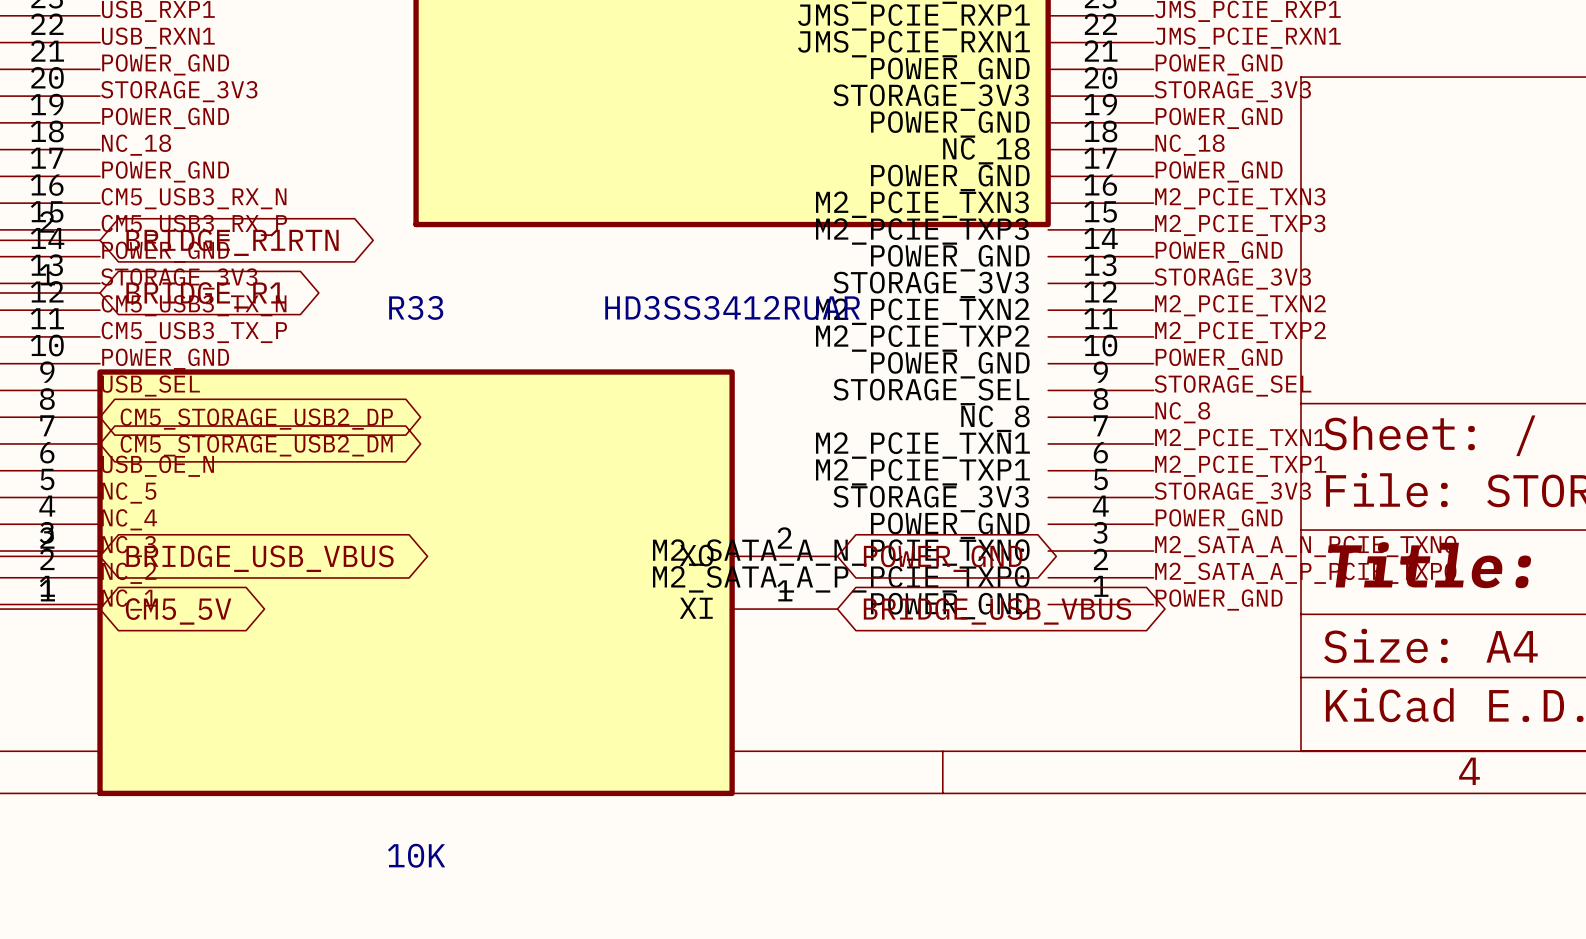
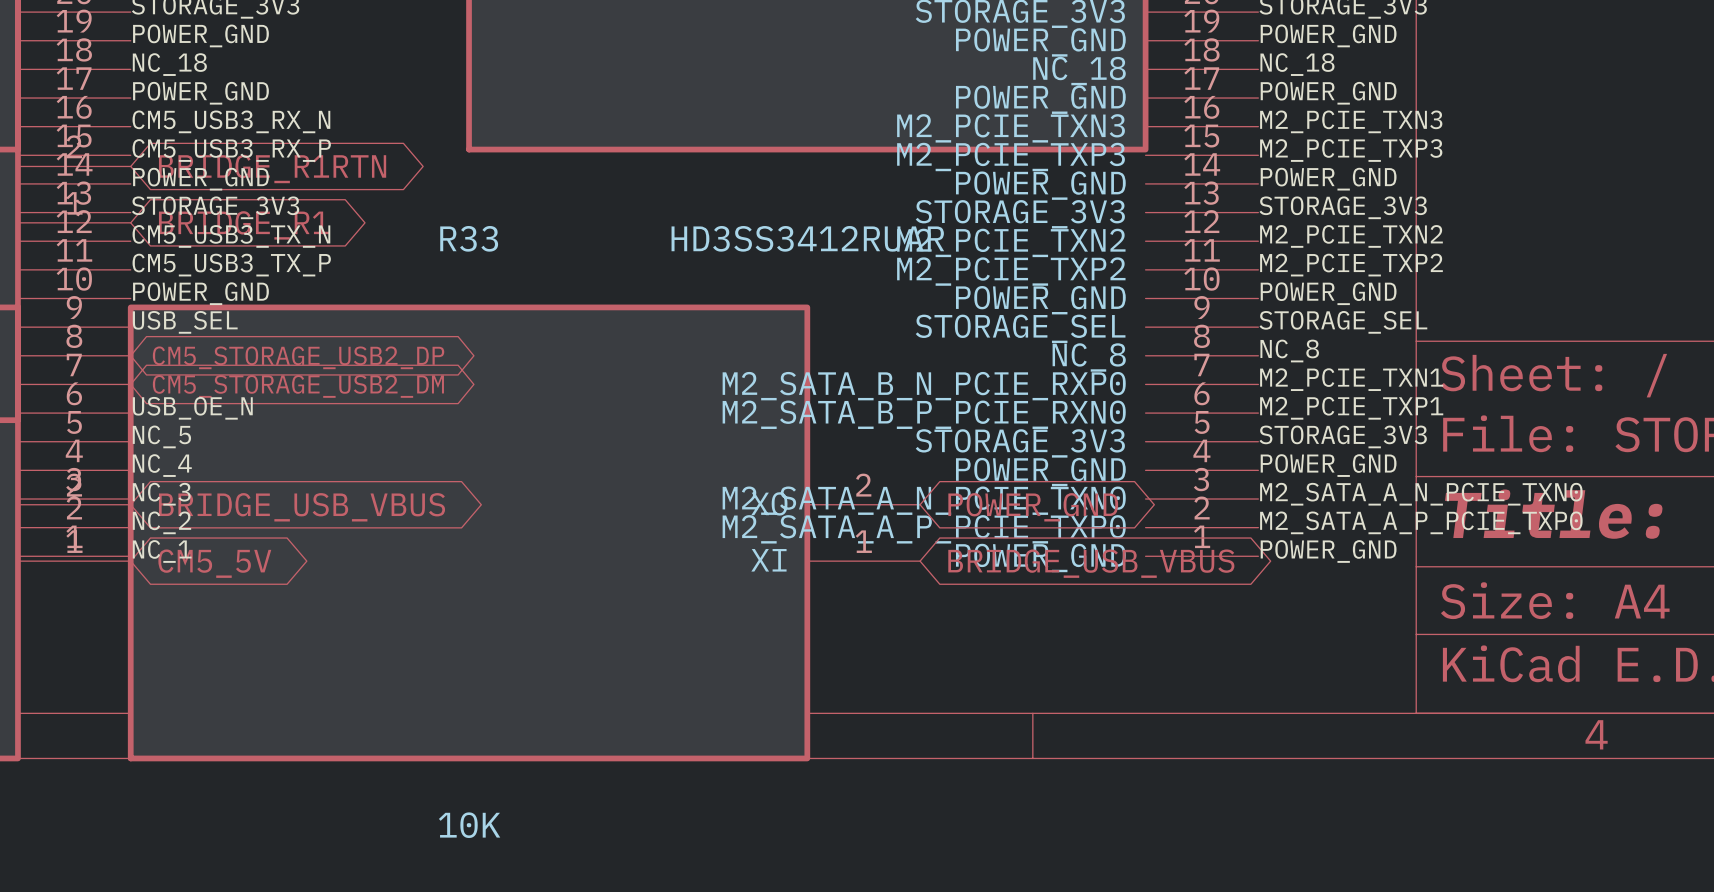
part pin name: M2_PCIE_TXN1 (922, 445) -> M2_SATA_B_N_PCIE_RXP0 (924, 386)
part pin name: M2_PCIE_TXP1 (922, 472) -> M2_SATA_B_P_PCIE_RXN0 (924, 414)

